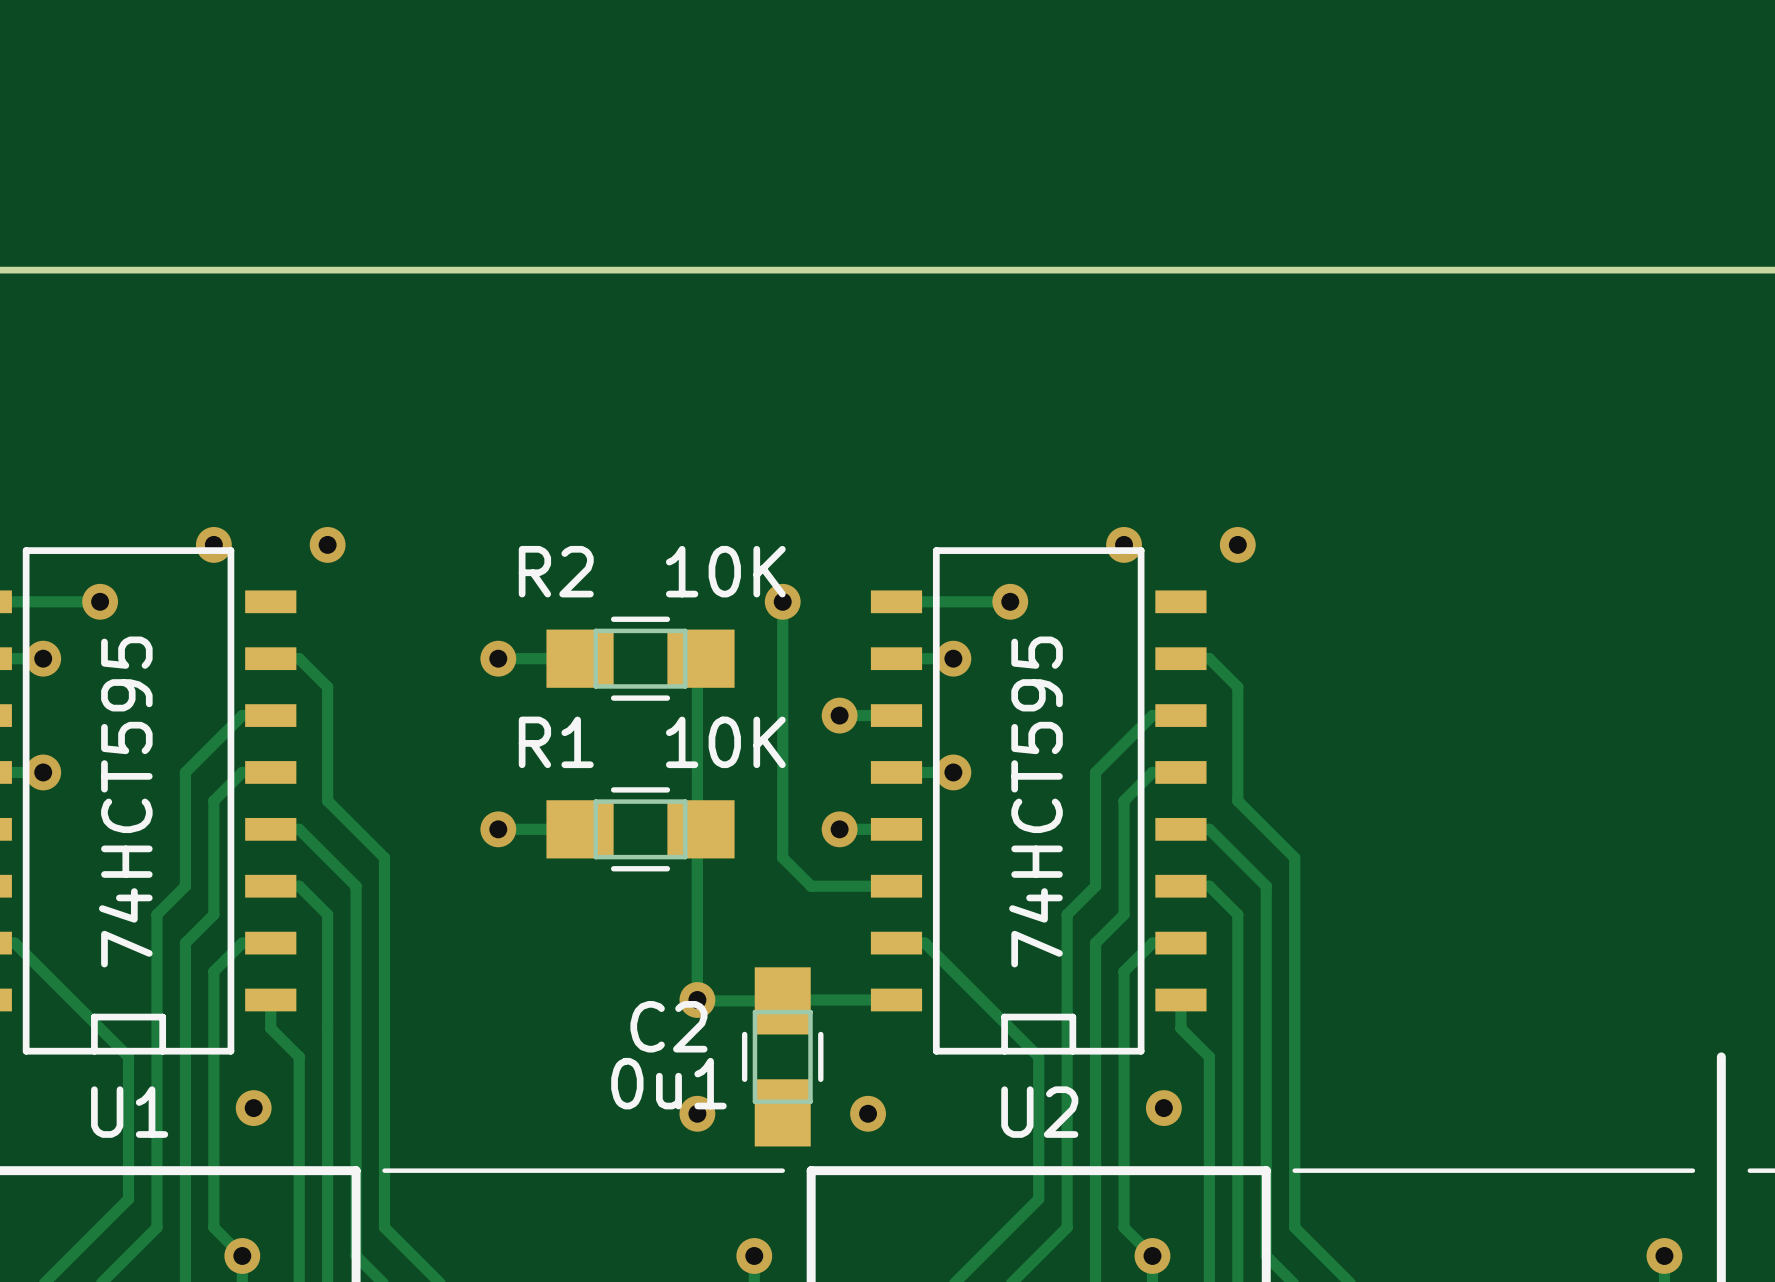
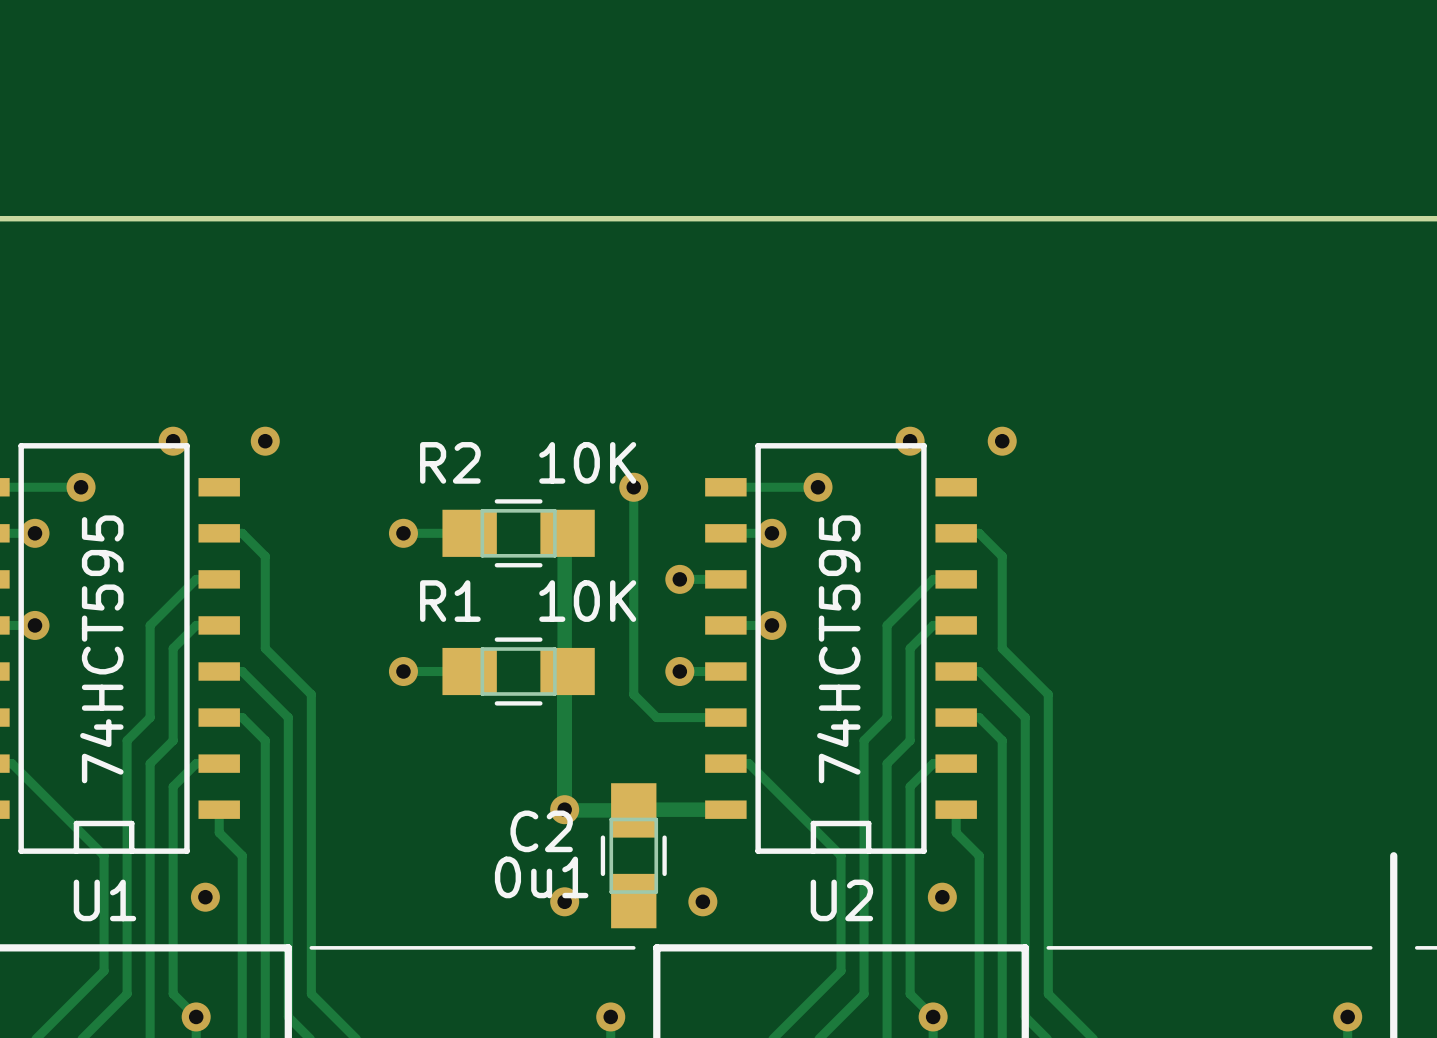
track width: thin (700, 658) (697, 662) (697, 1000) (782, 1000) -> thick (567, 533) (564, 536) (564, 809) (633, 810)
track width: thin (780, 1000) (896, 1000) -> thick (632, 809) (725, 809)

